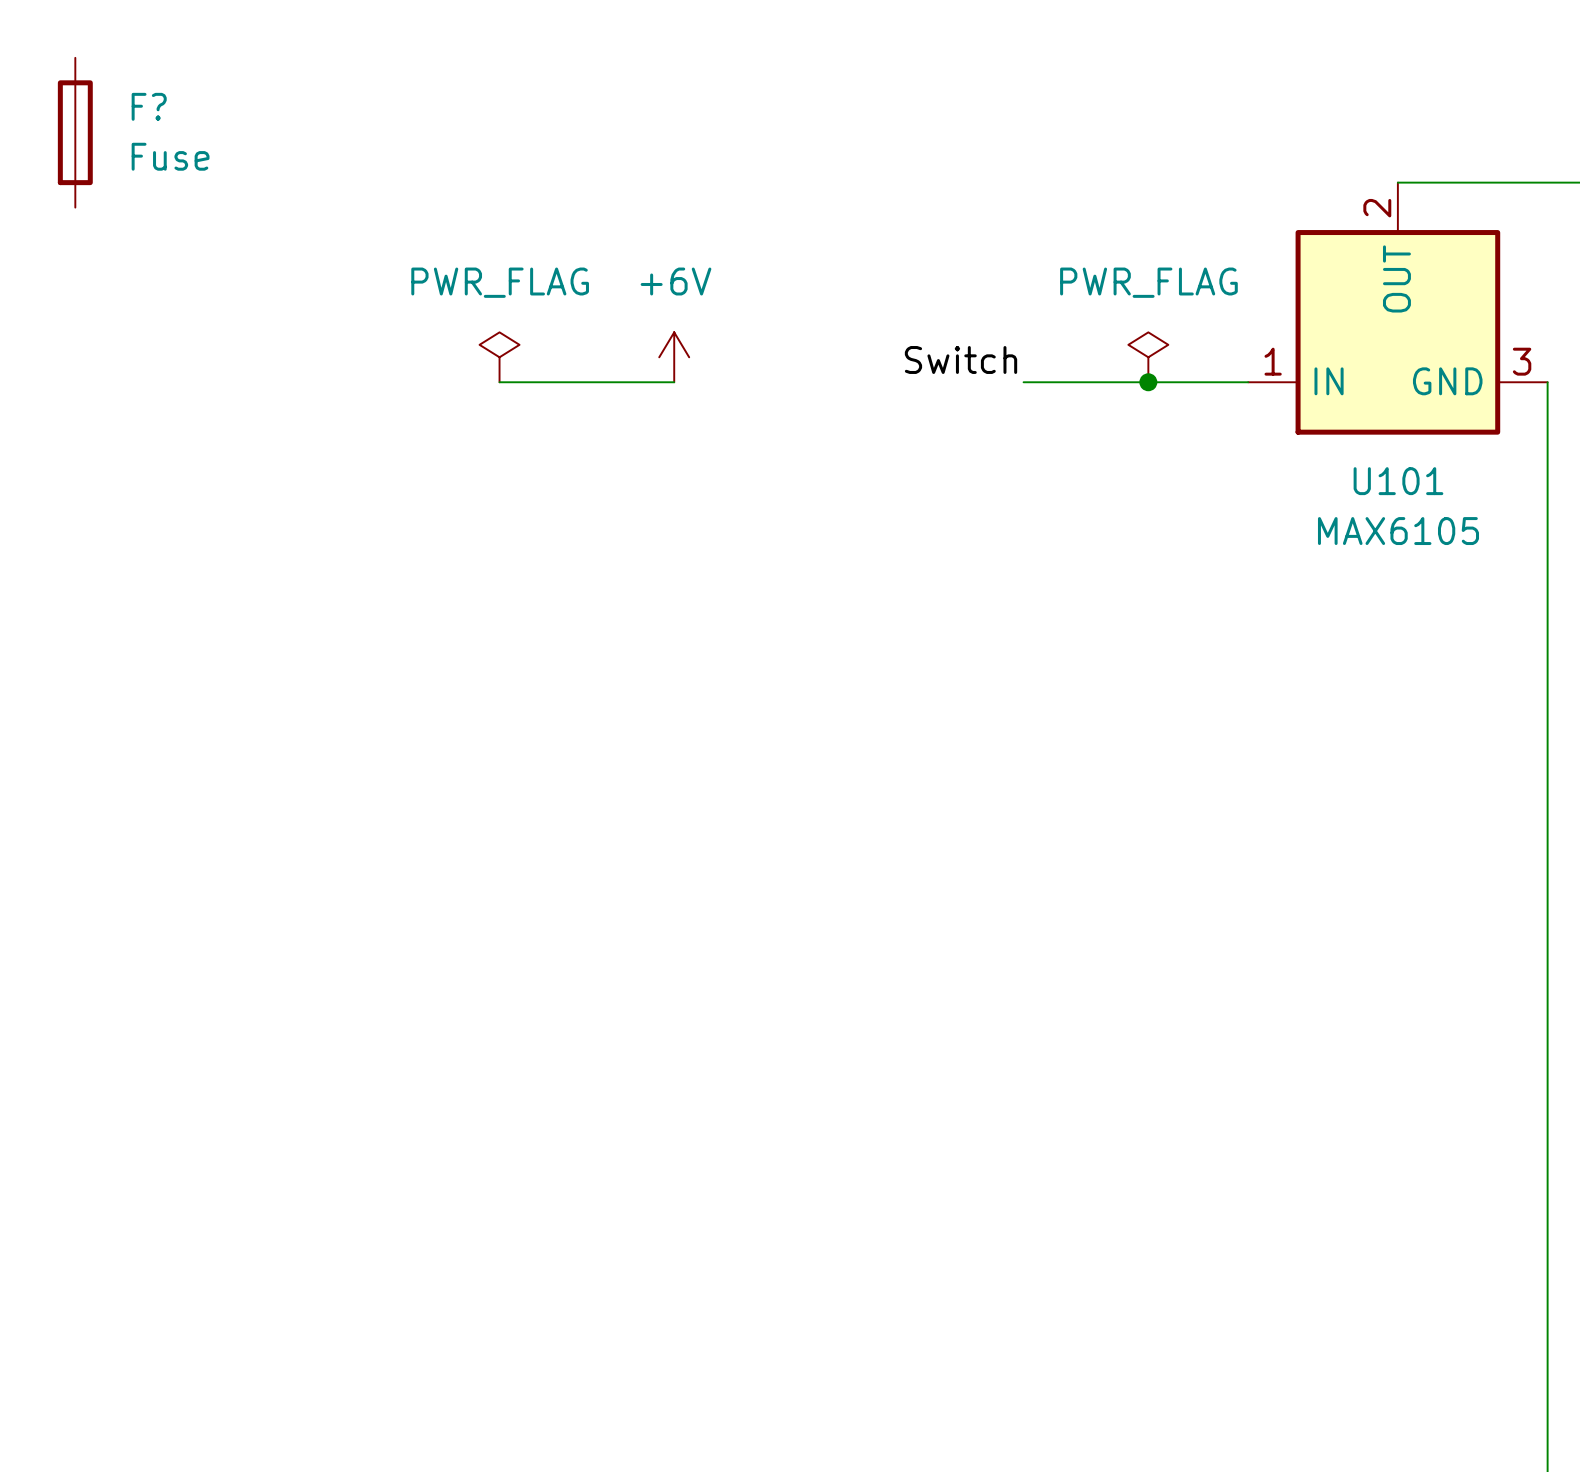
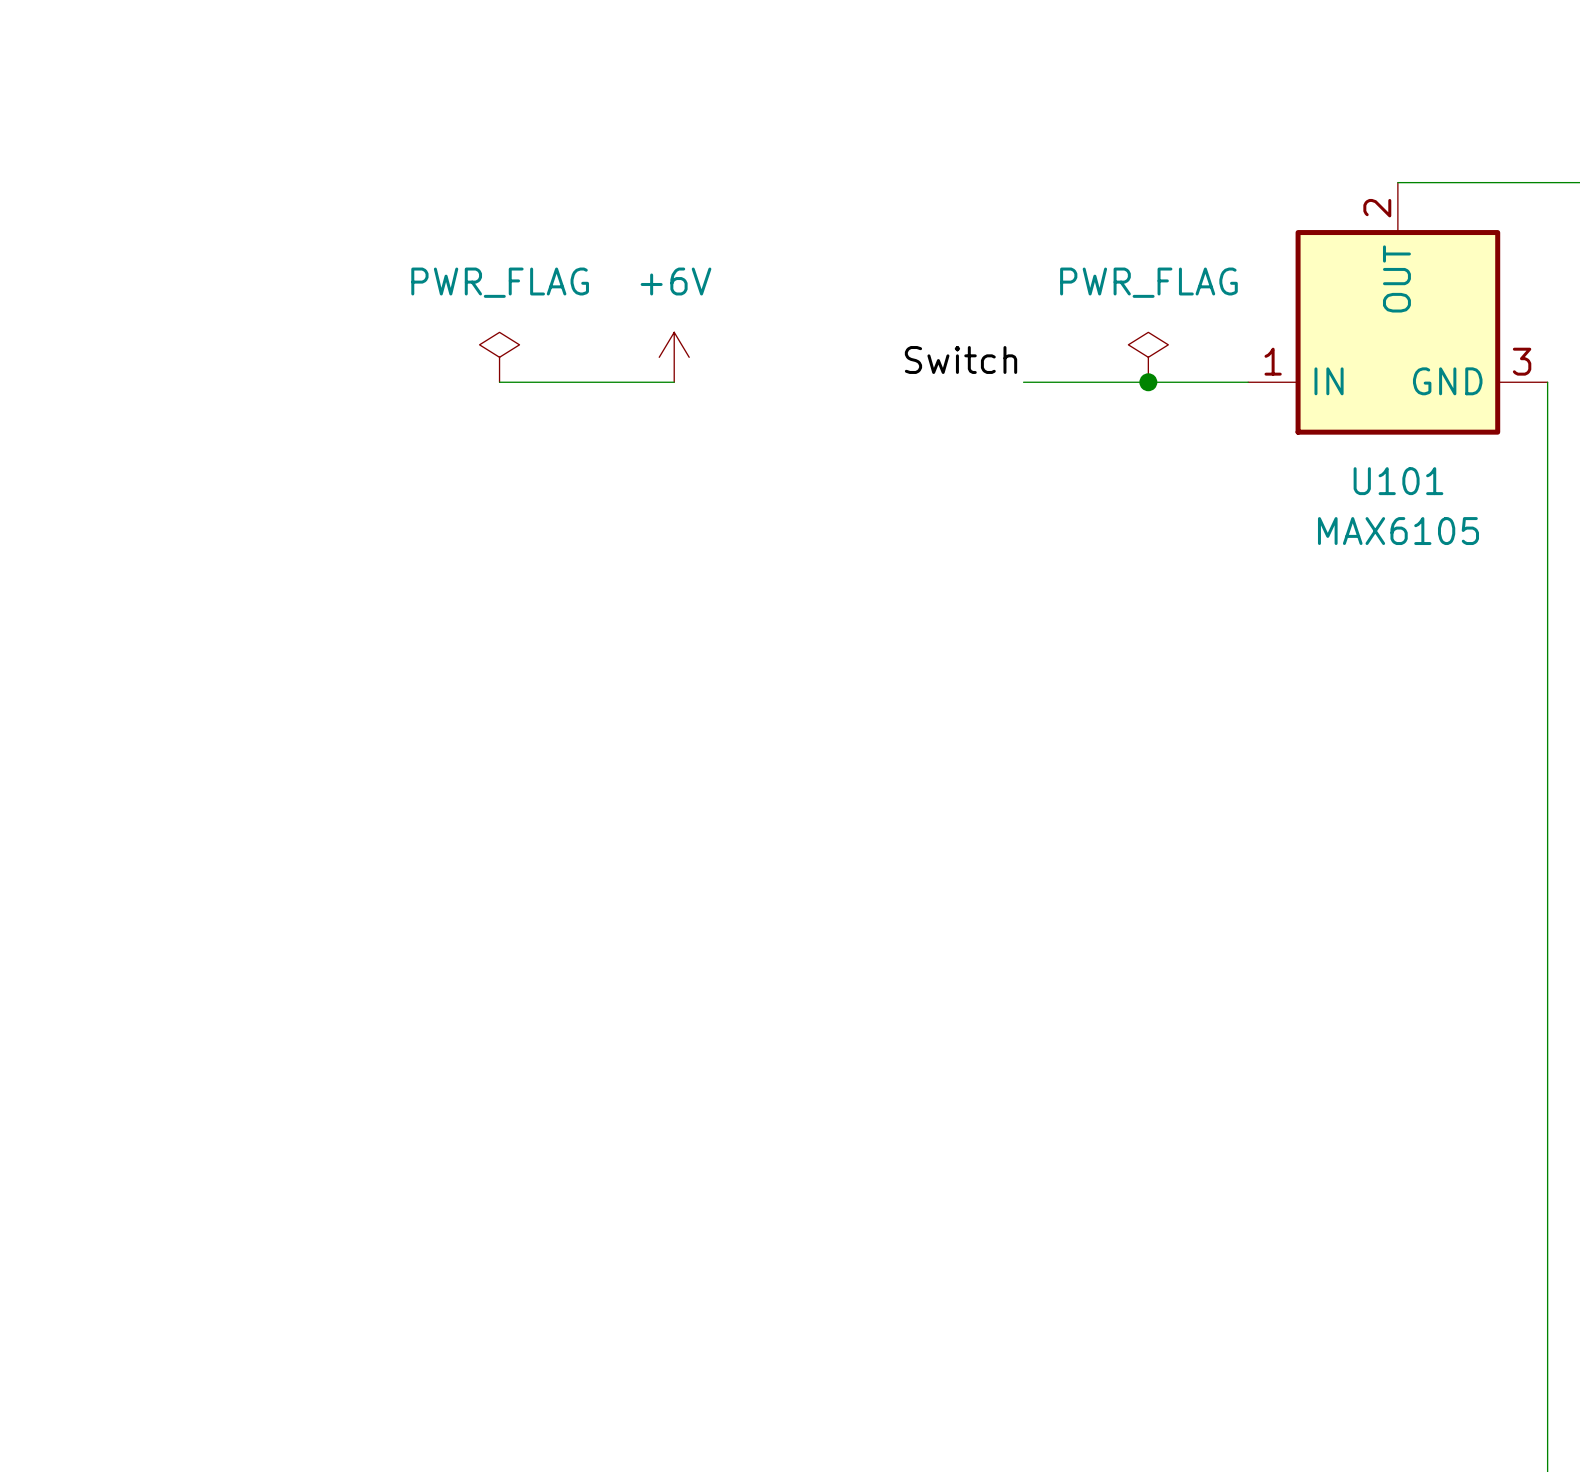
F?: Fuse (75, 132) -> none

